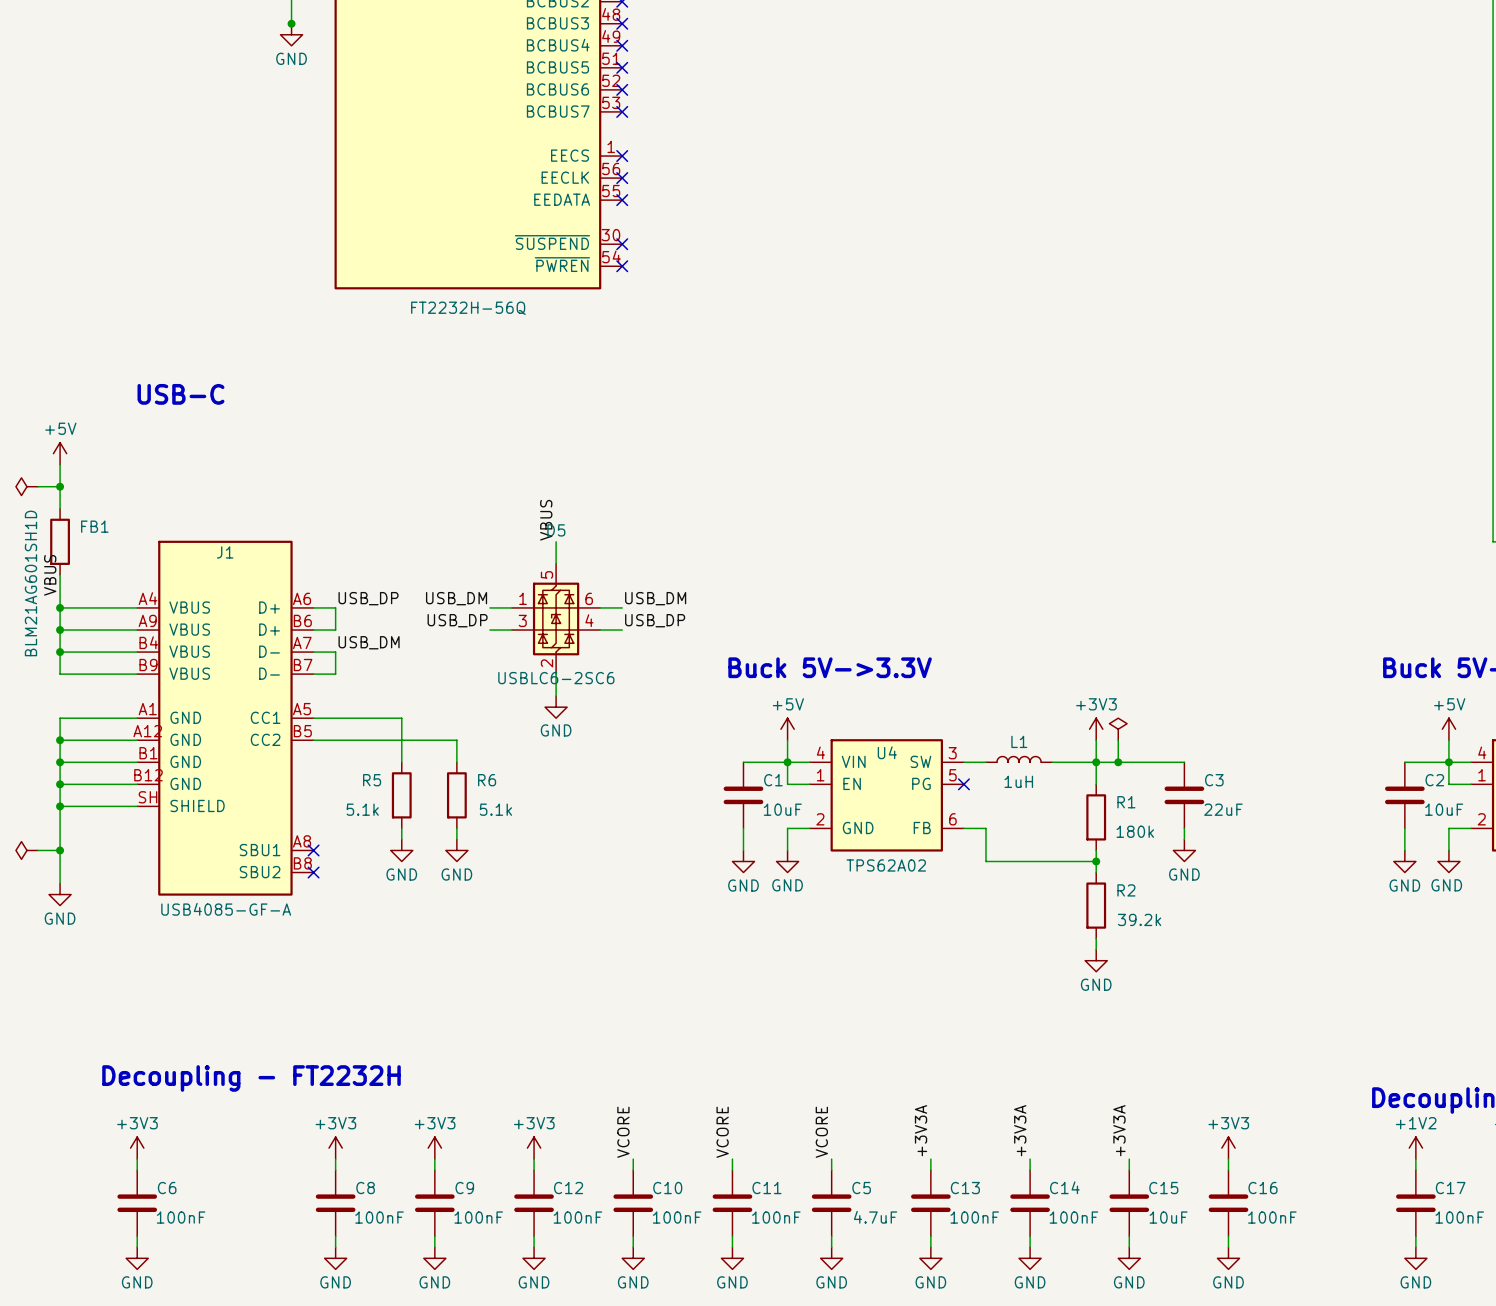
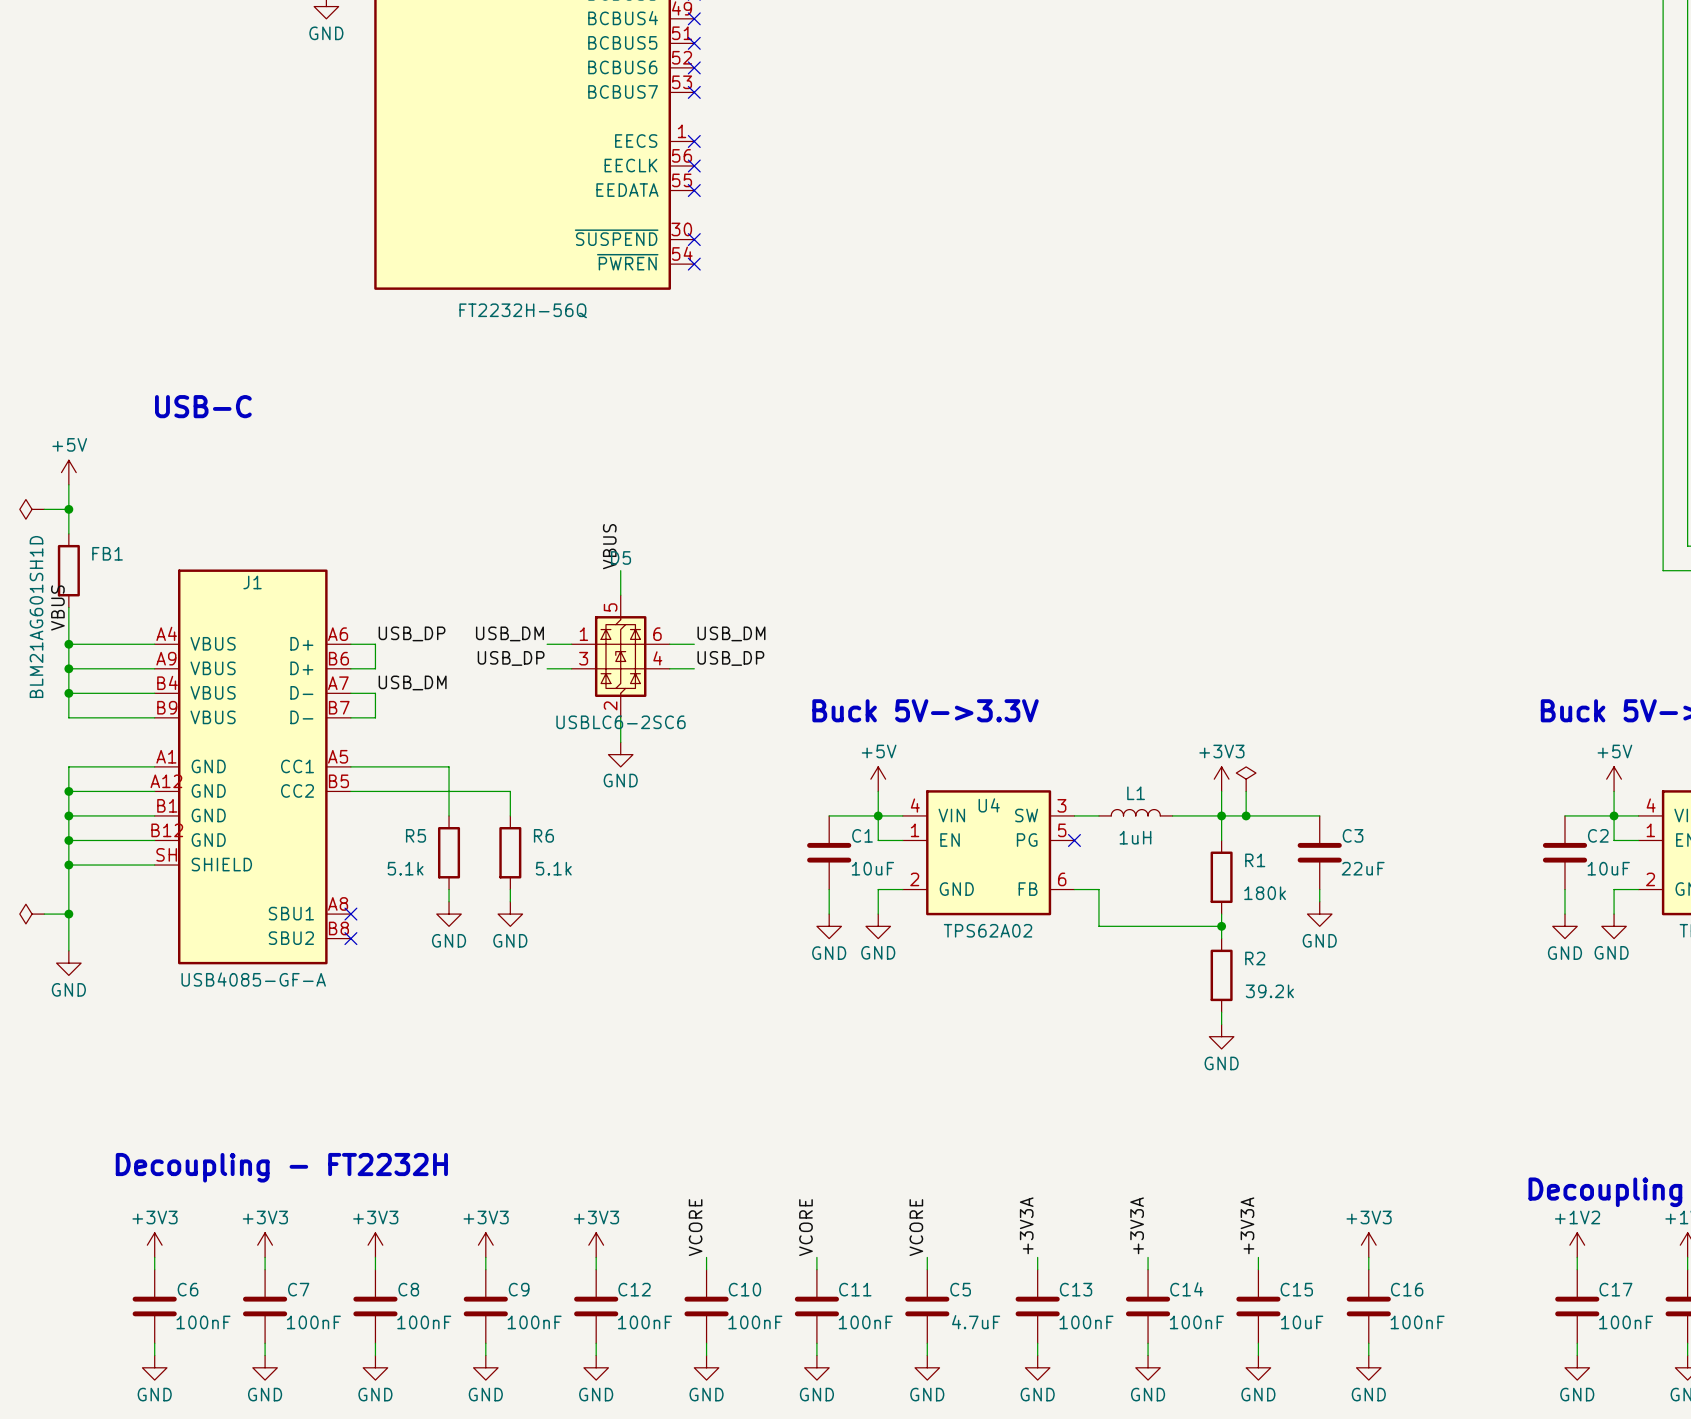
power symbol: none -> +3V3 (265, 1245)
wire: none -> (265, 1257) (265, 1269)
C7: none -> 100nF (265, 1306)
wire: none -> (265, 1343) (265, 1355)
power symbol: none -> GND (265, 1367)

